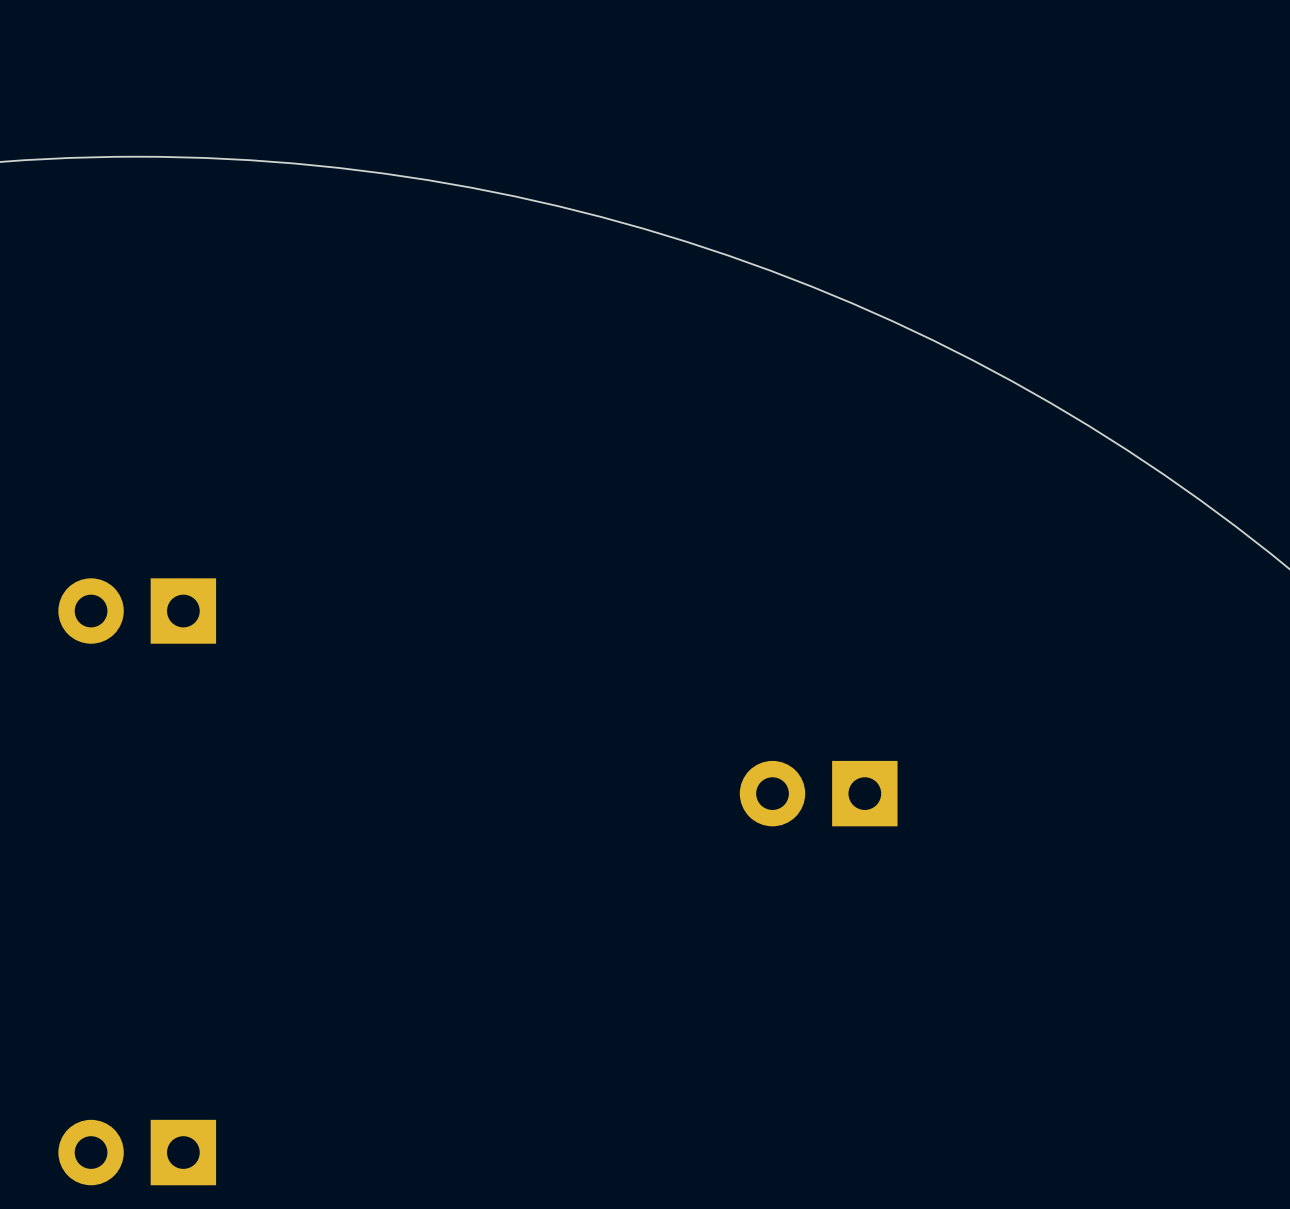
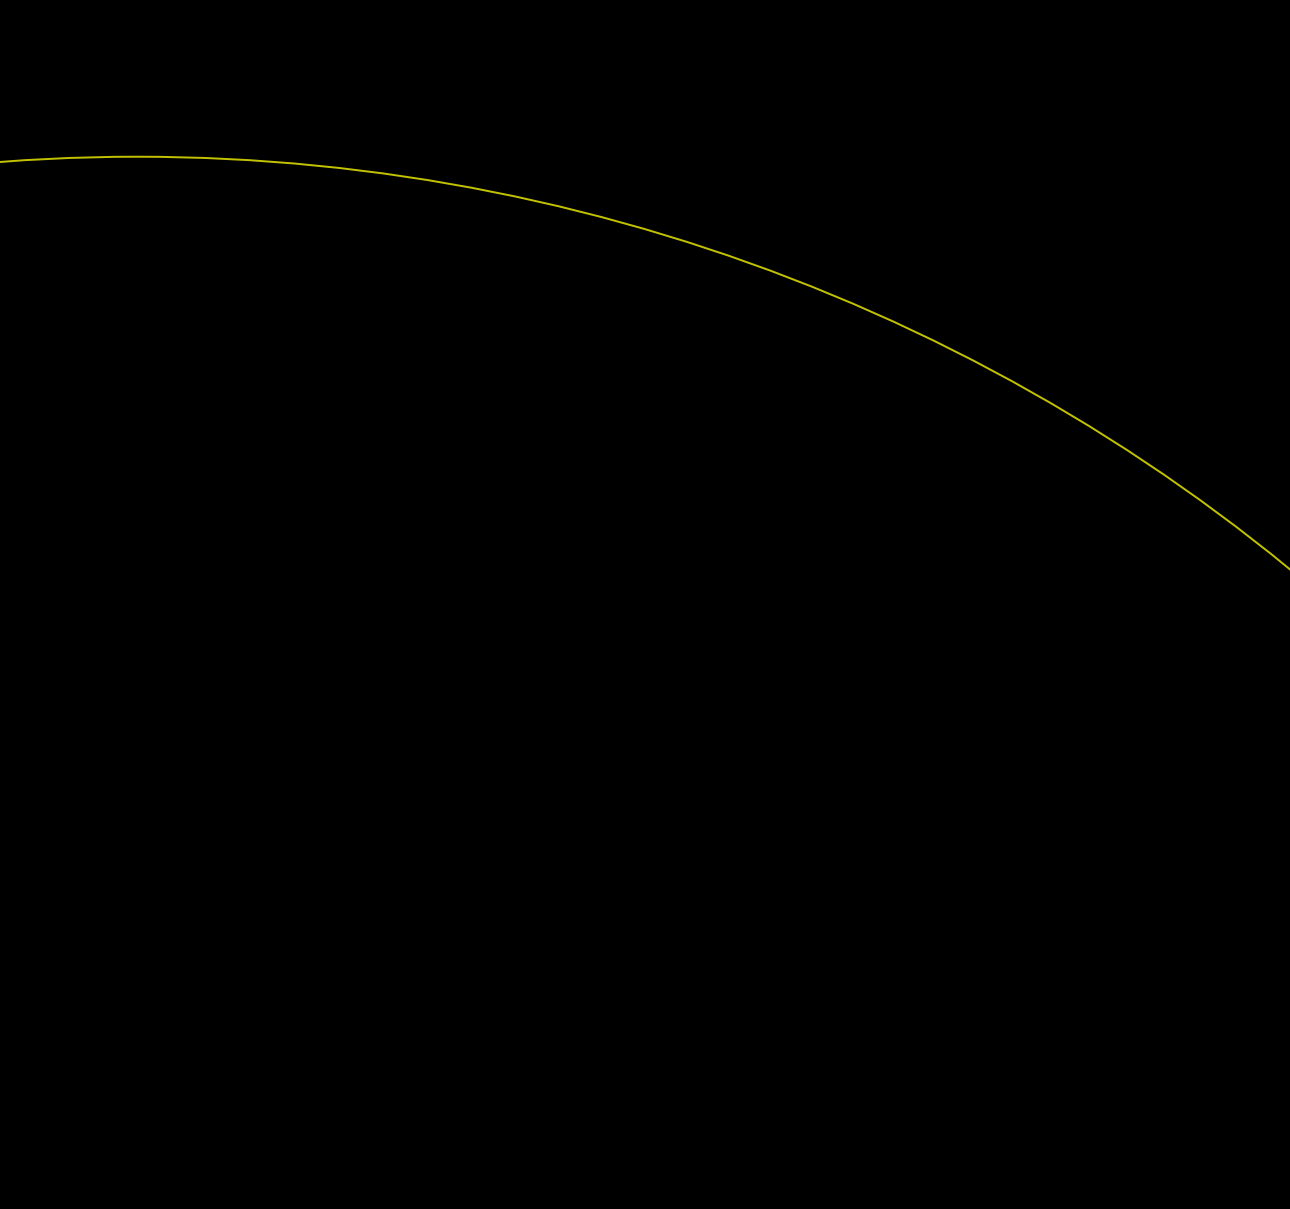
part: (137, 611) -> none
part: (818, 793) -> none
part: (137, 1152) -> none

